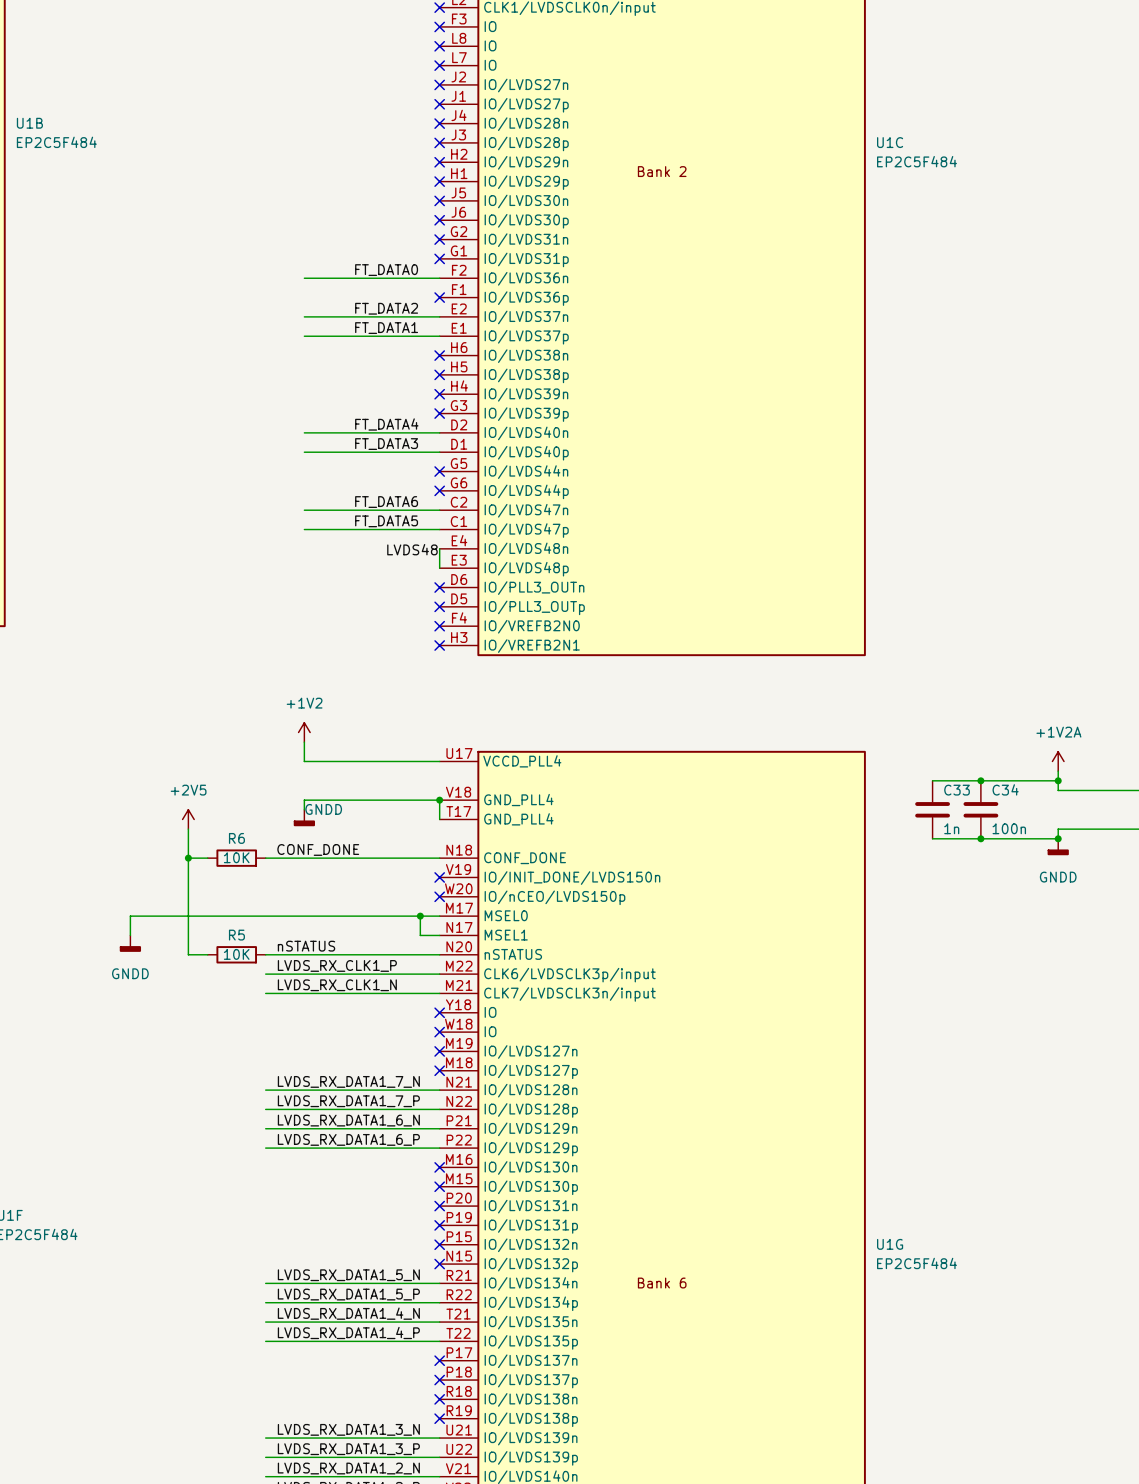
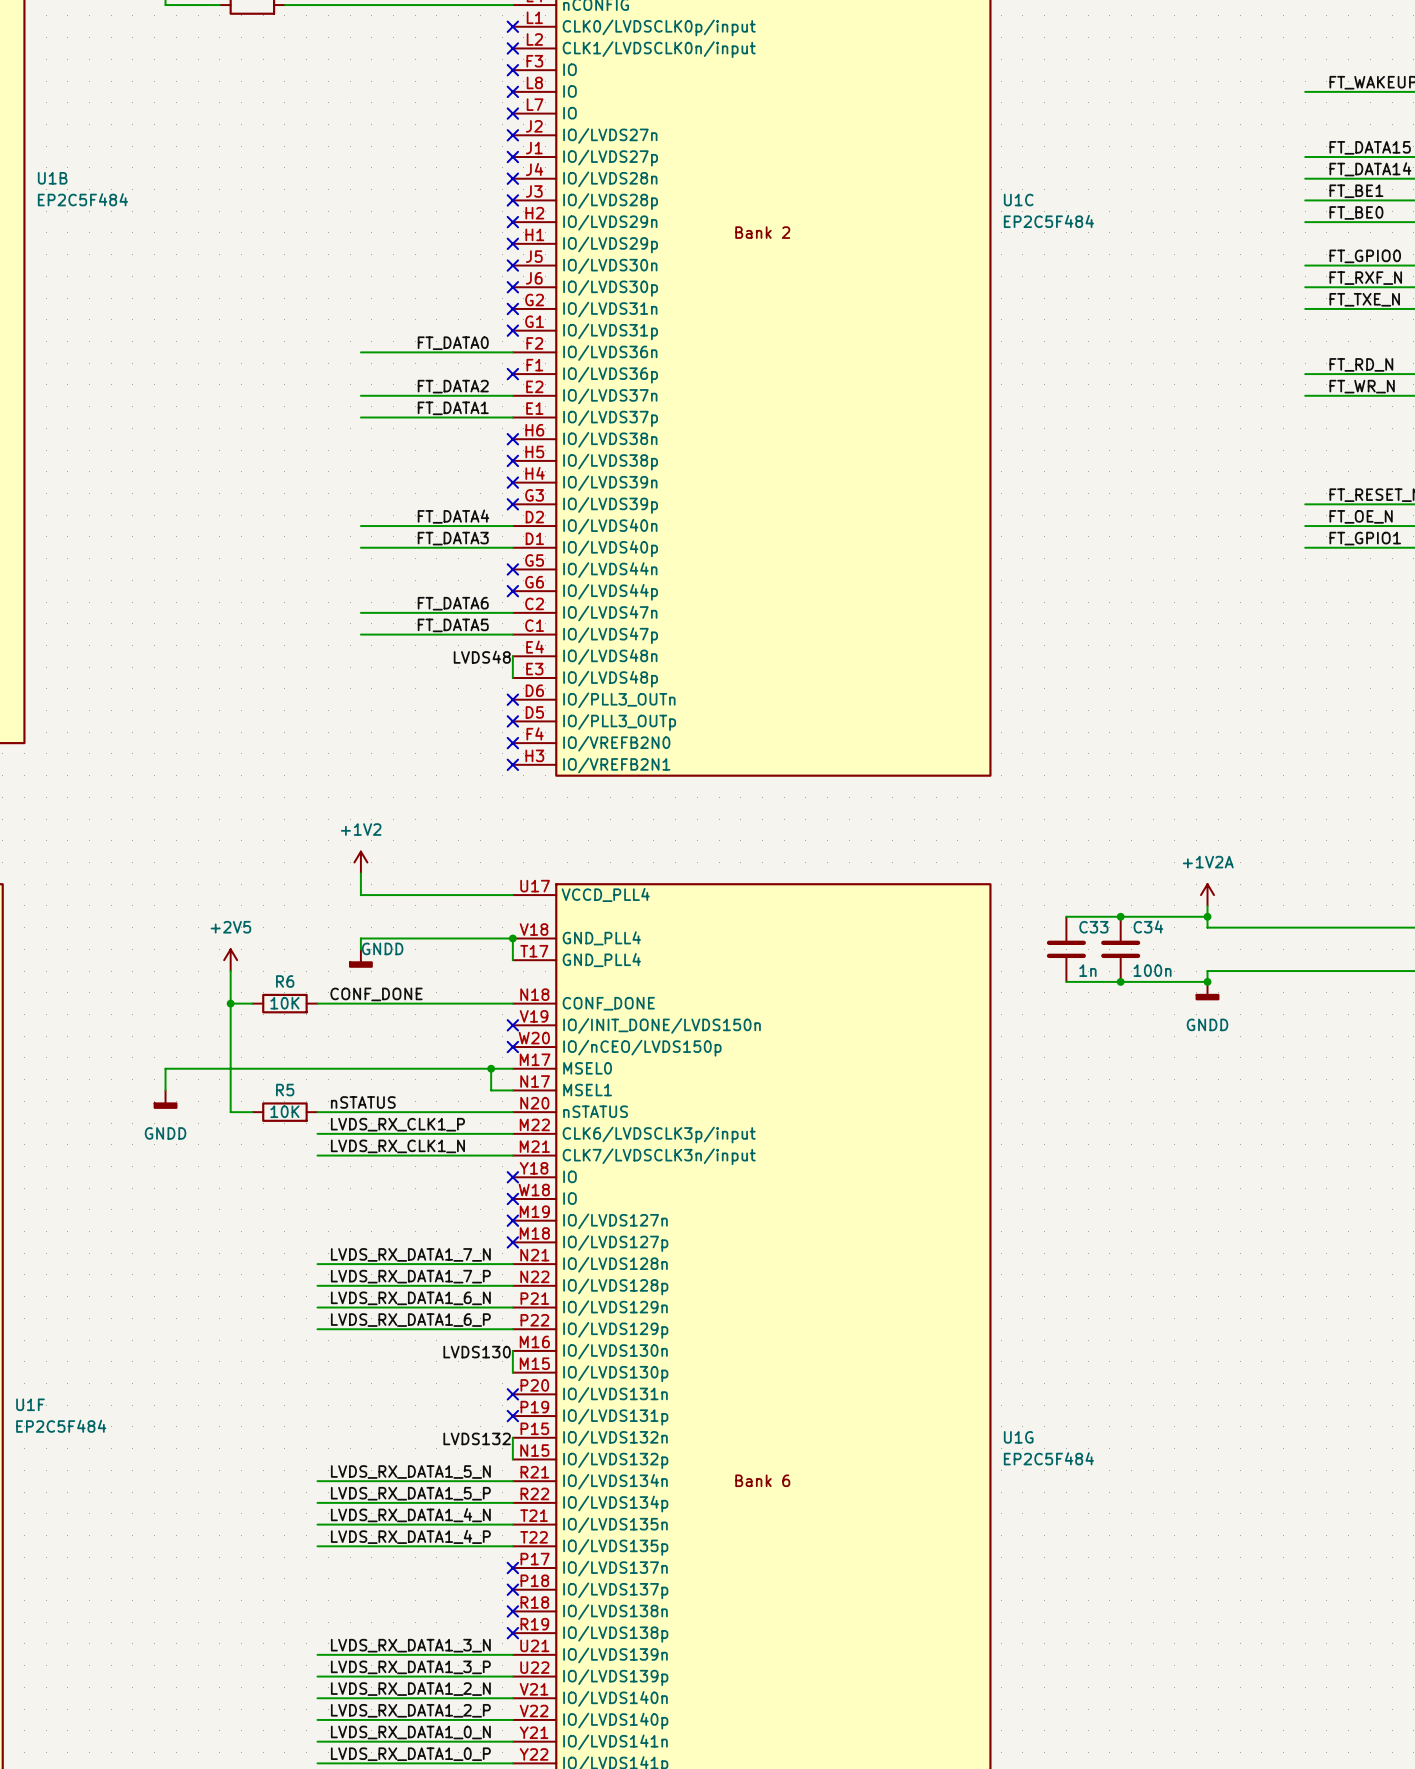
wire: none -> (512, 1350) (512, 1372)
no-connect mark: (439, 1167) -> none
label: none -> LVDS130 (477, 1352)
no-connect mark: (439, 1186) -> none
wire: none -> (512, 1437) (512, 1459)
no-connect mark: (439, 1244) -> none
label: none -> LVDS132 (477, 1438)
no-connect mark: (439, 1264) -> none

